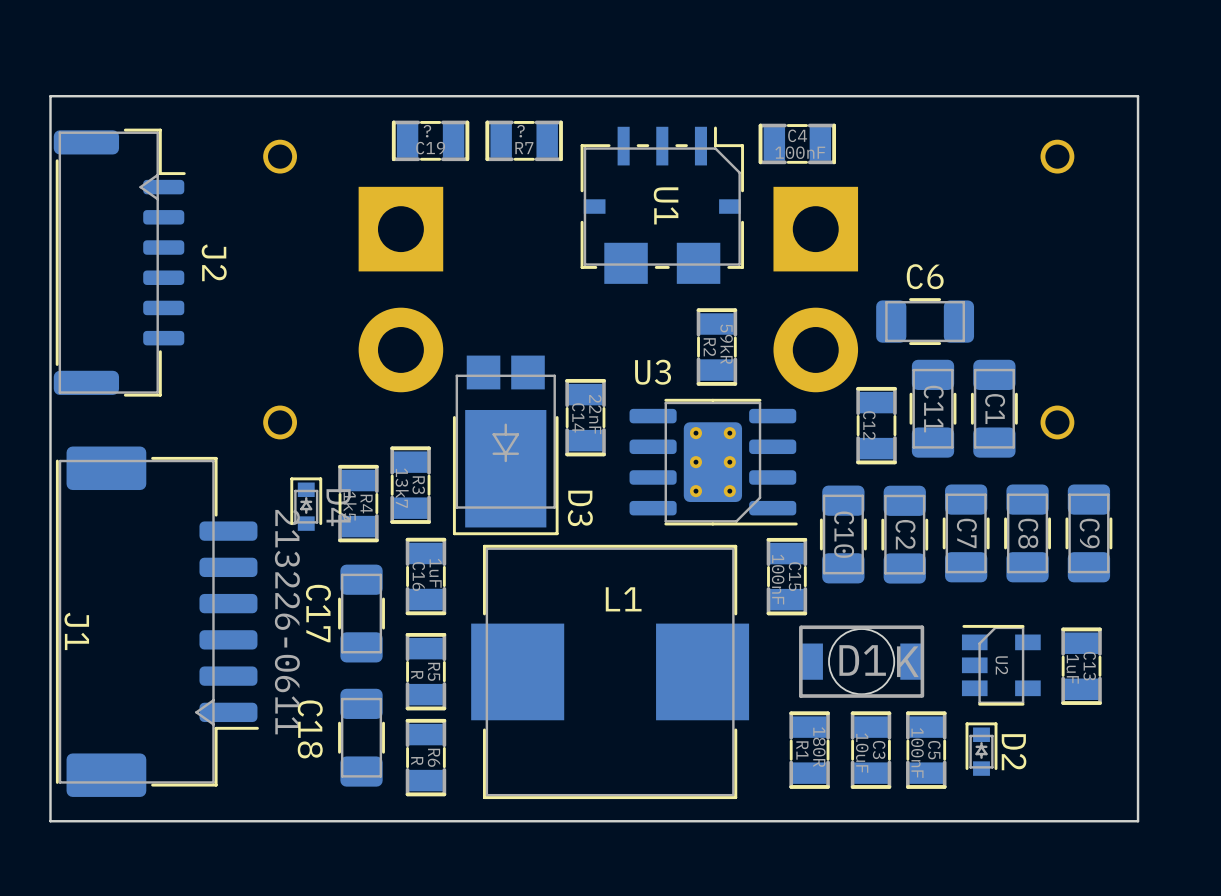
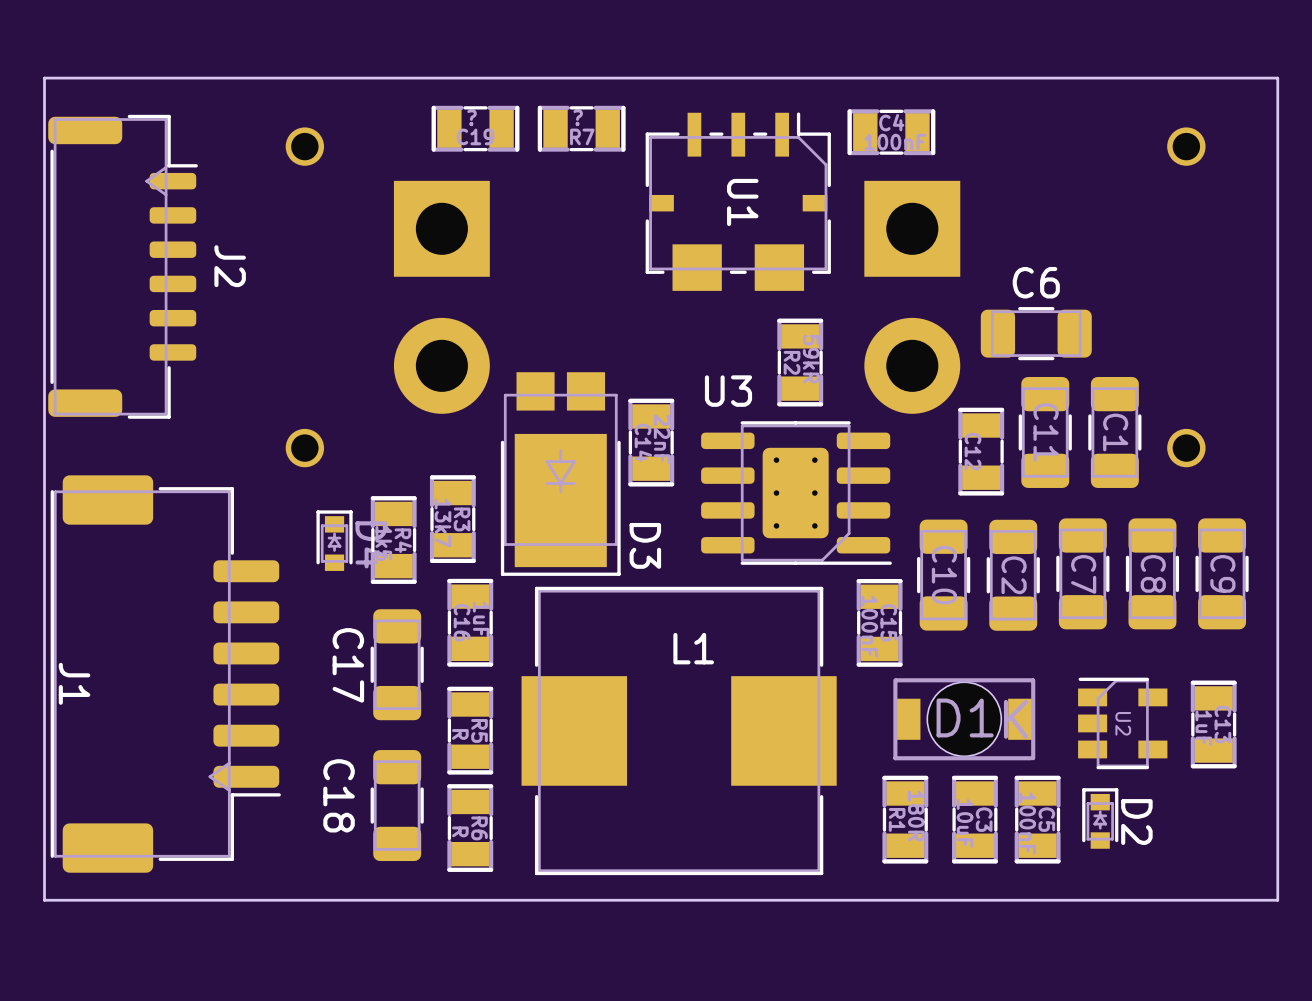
J1 value: 213226-0611 (287, 622) -> none

